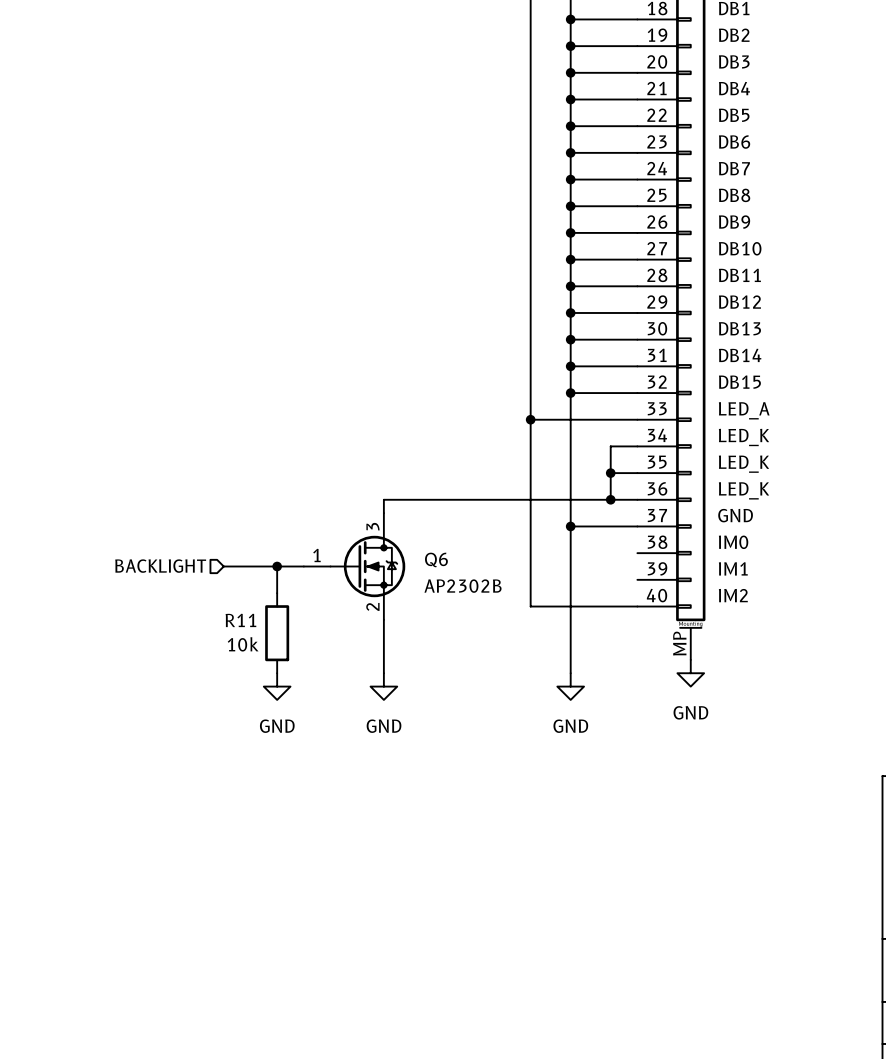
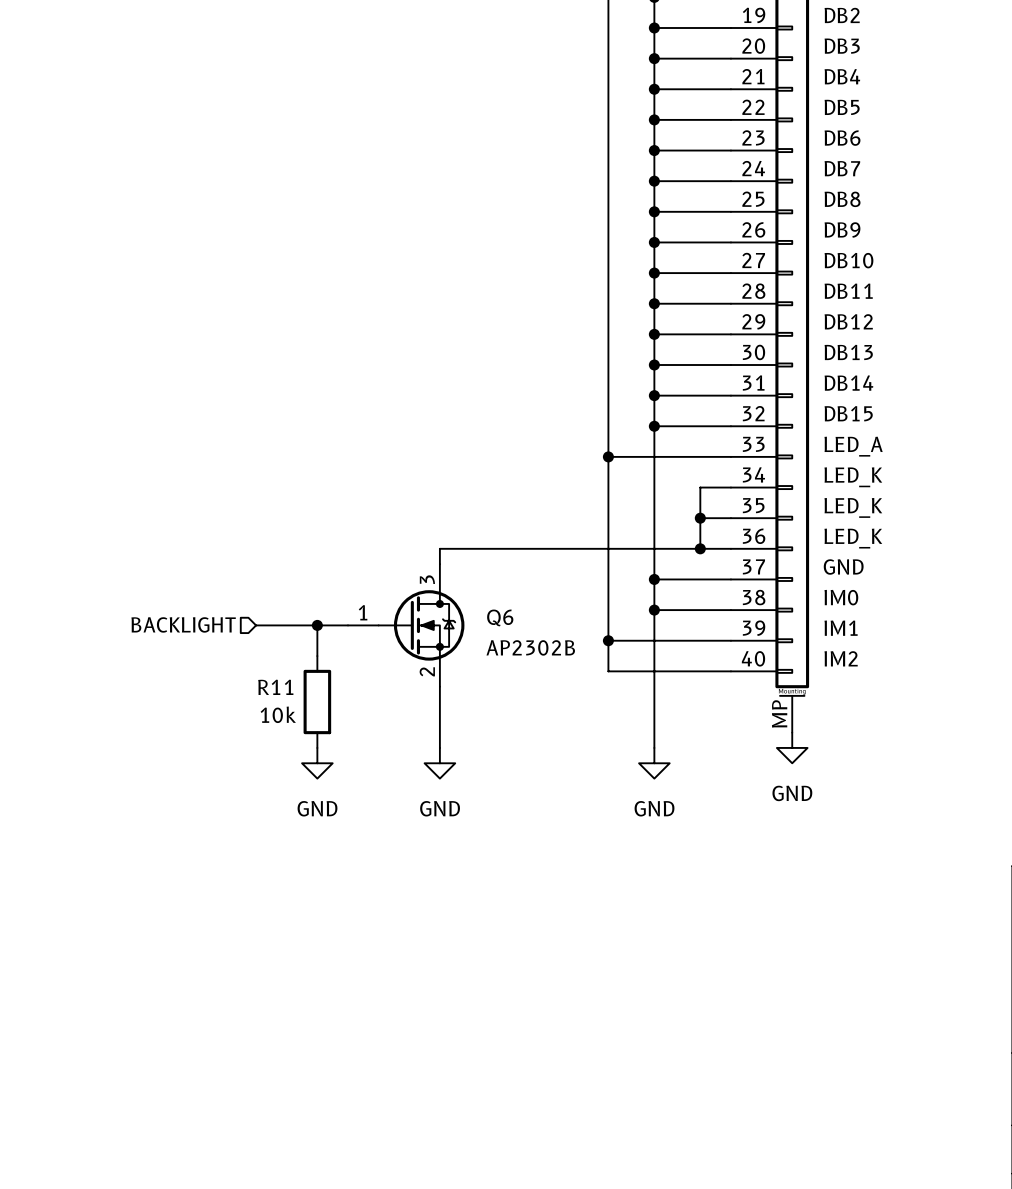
wire: none -> (654, 610) (730, 610)
junction: none -> (654, 610)
wire: none -> (608, 640) (730, 640)
junction: none -> (608, 640)

